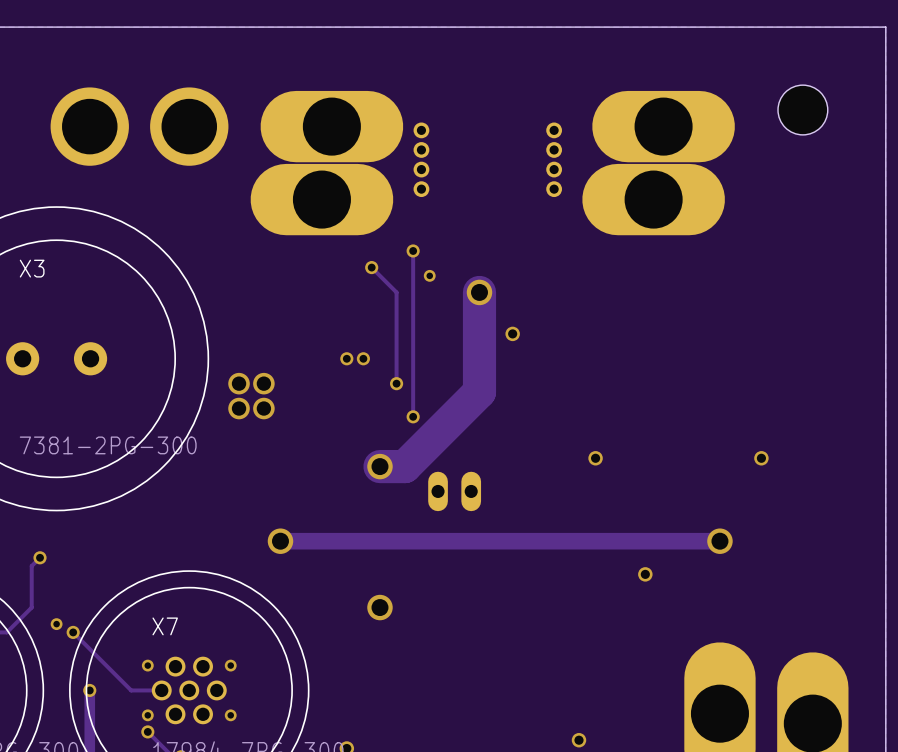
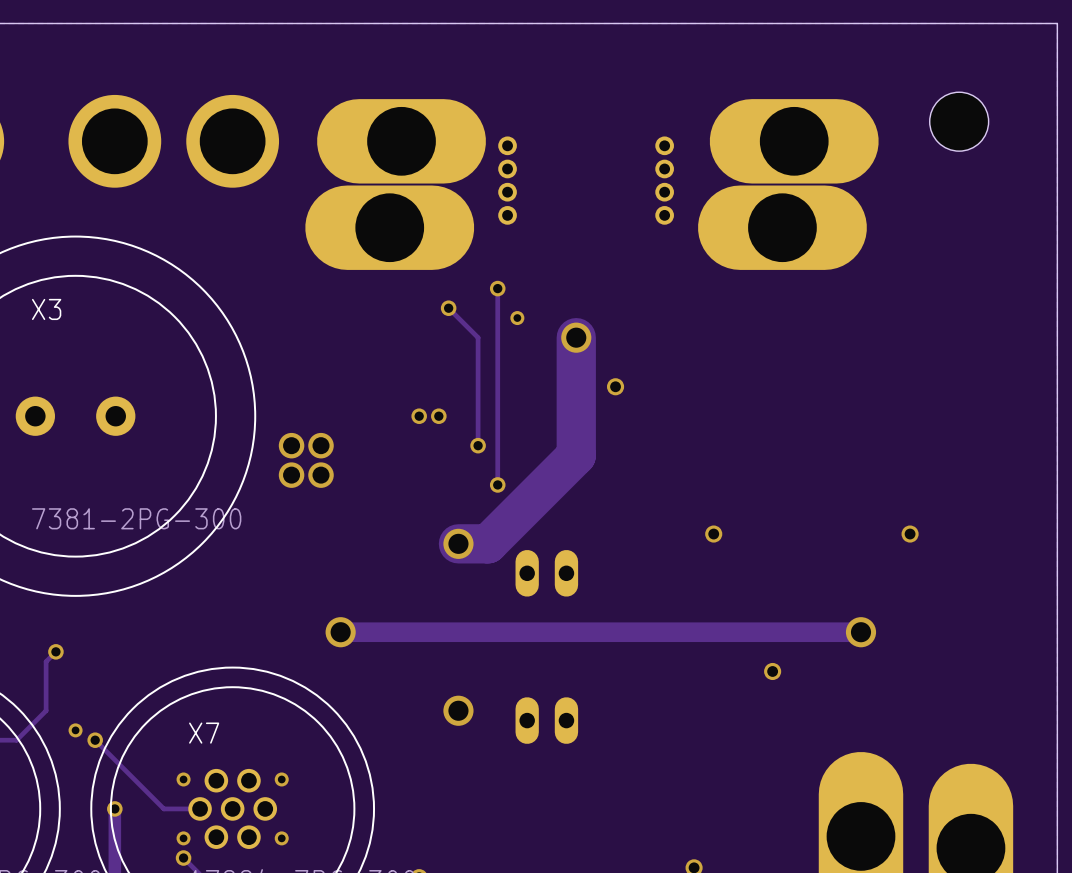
part: none -> (546, 720)

